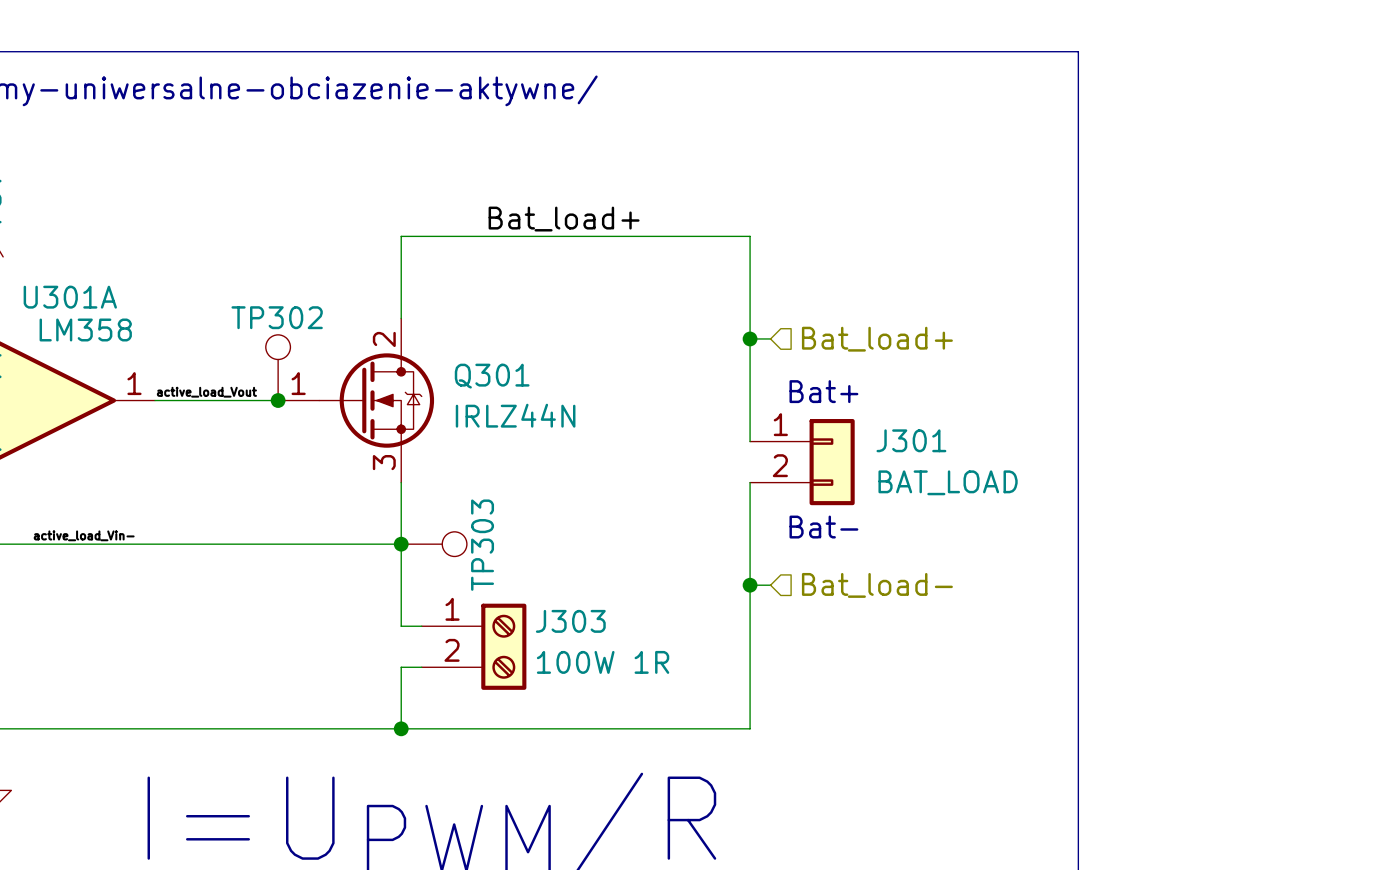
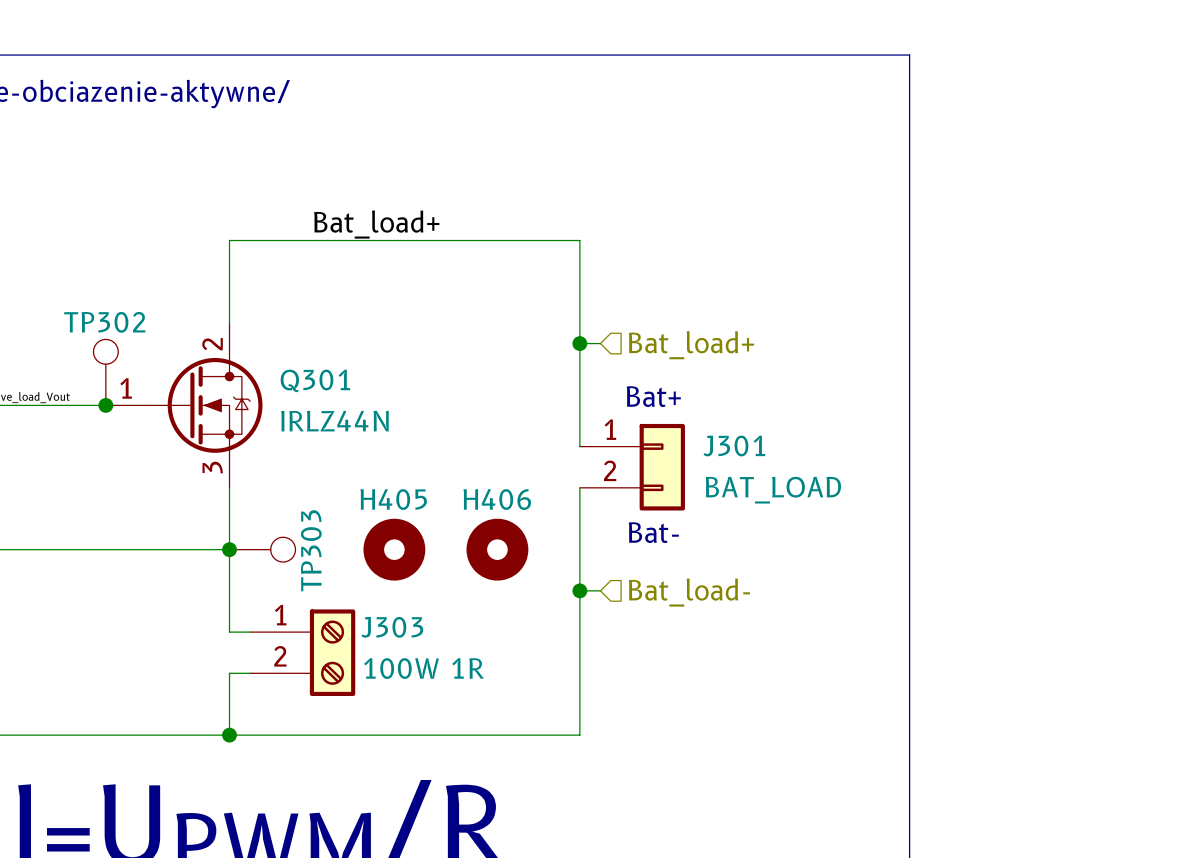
H405: none -> (394, 549)
H406: none -> (497, 549)

